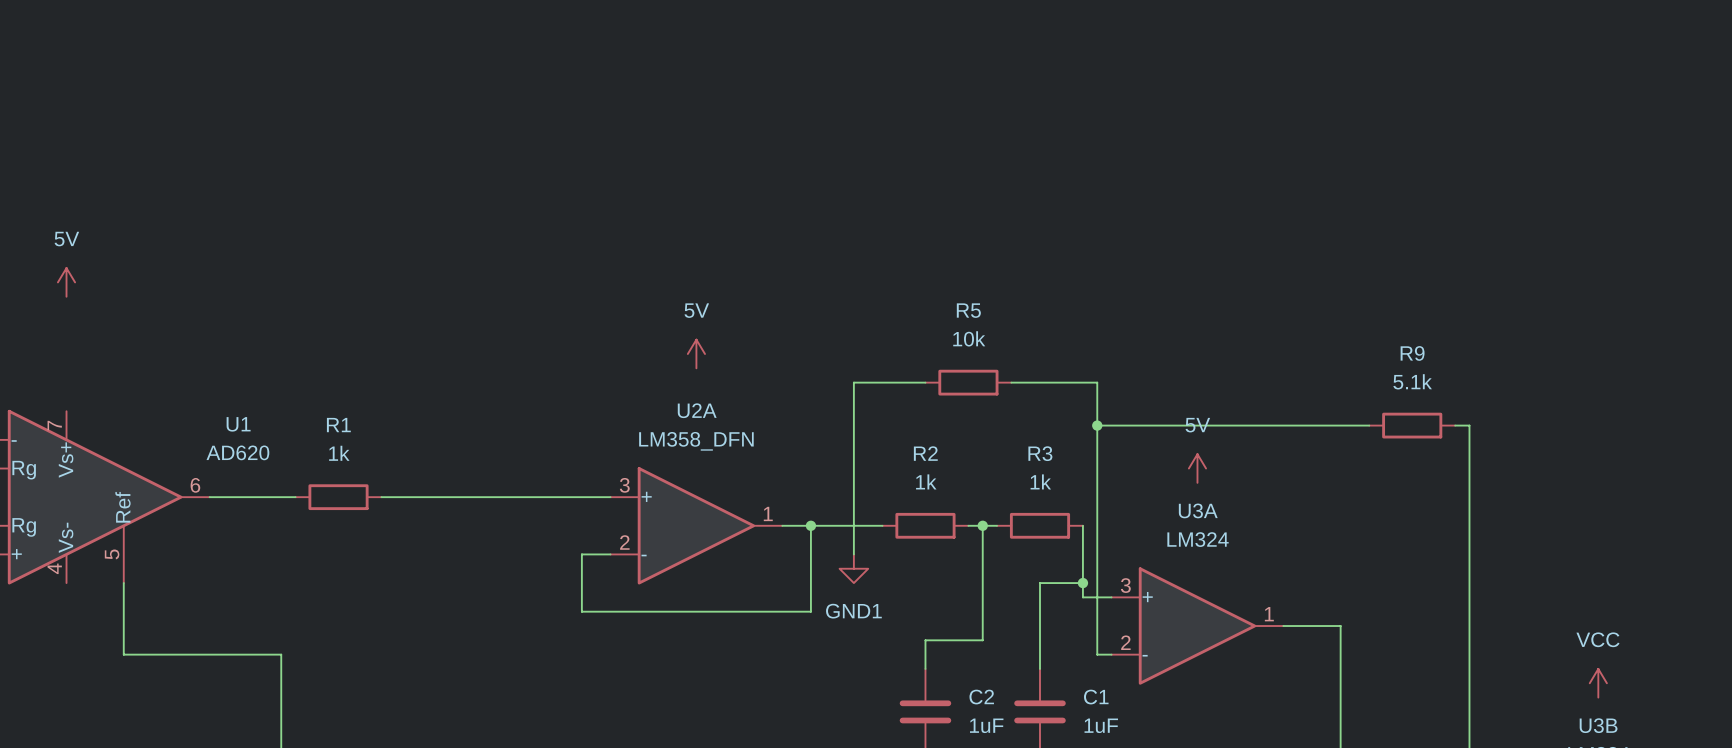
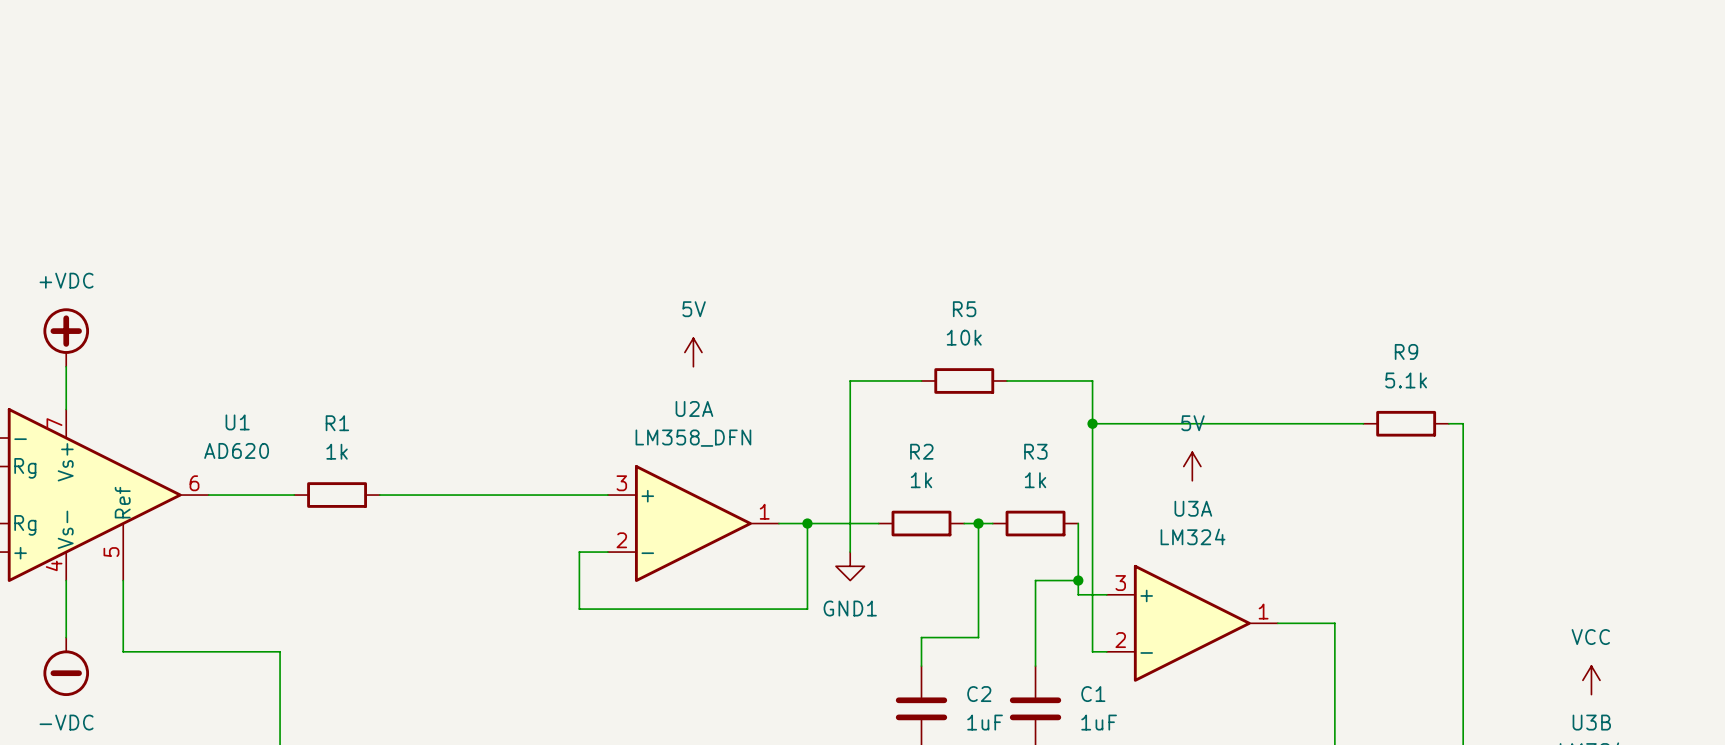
power symbol: 5V (66, 282) -> none
power symbol: none -> +VDC (66, 337)
wire: none -> (66, 366) (66, 409)
wire: none -> (66, 580) (66, 637)
power symbol: none -> -VDC (66, 666)

